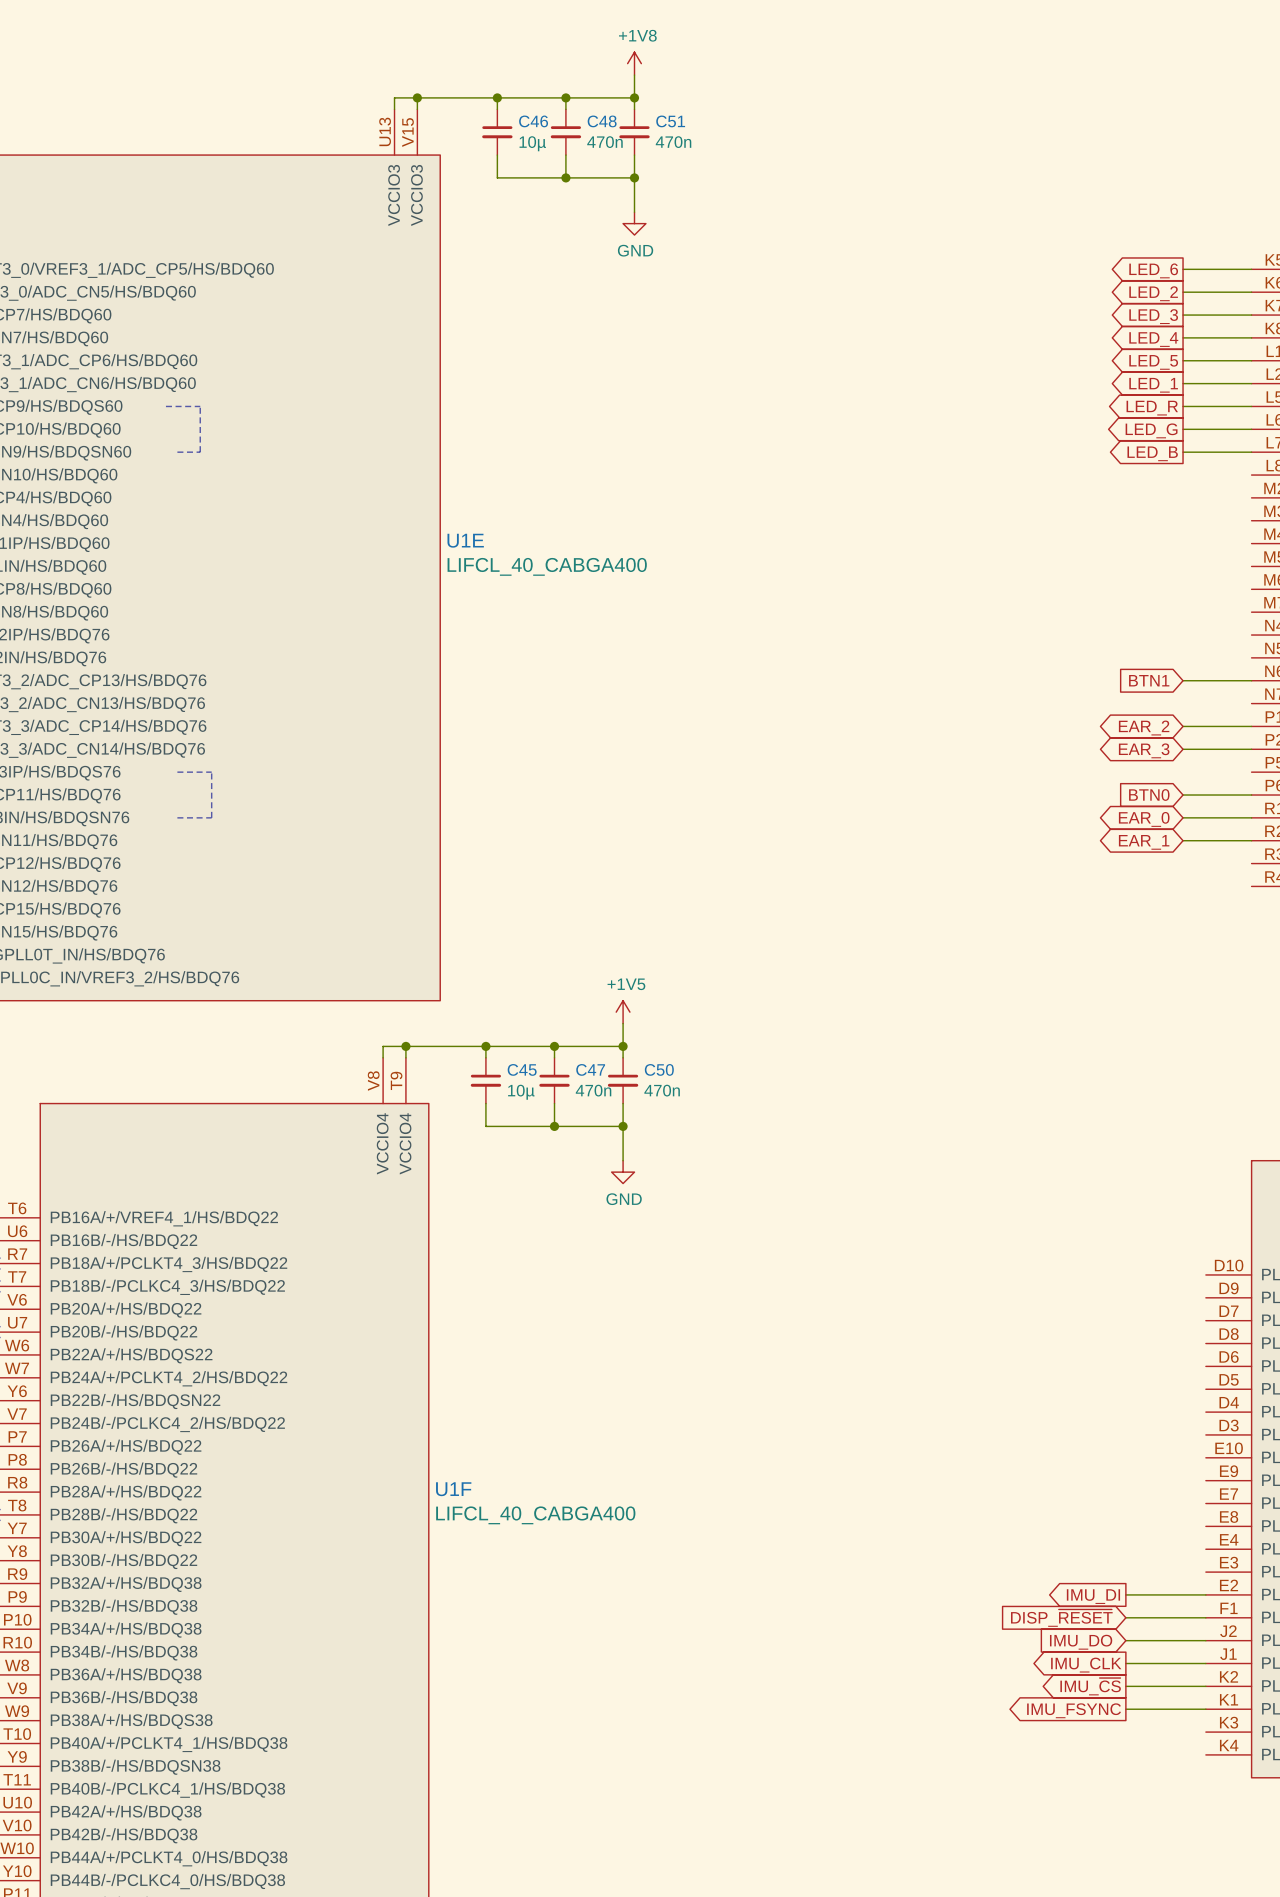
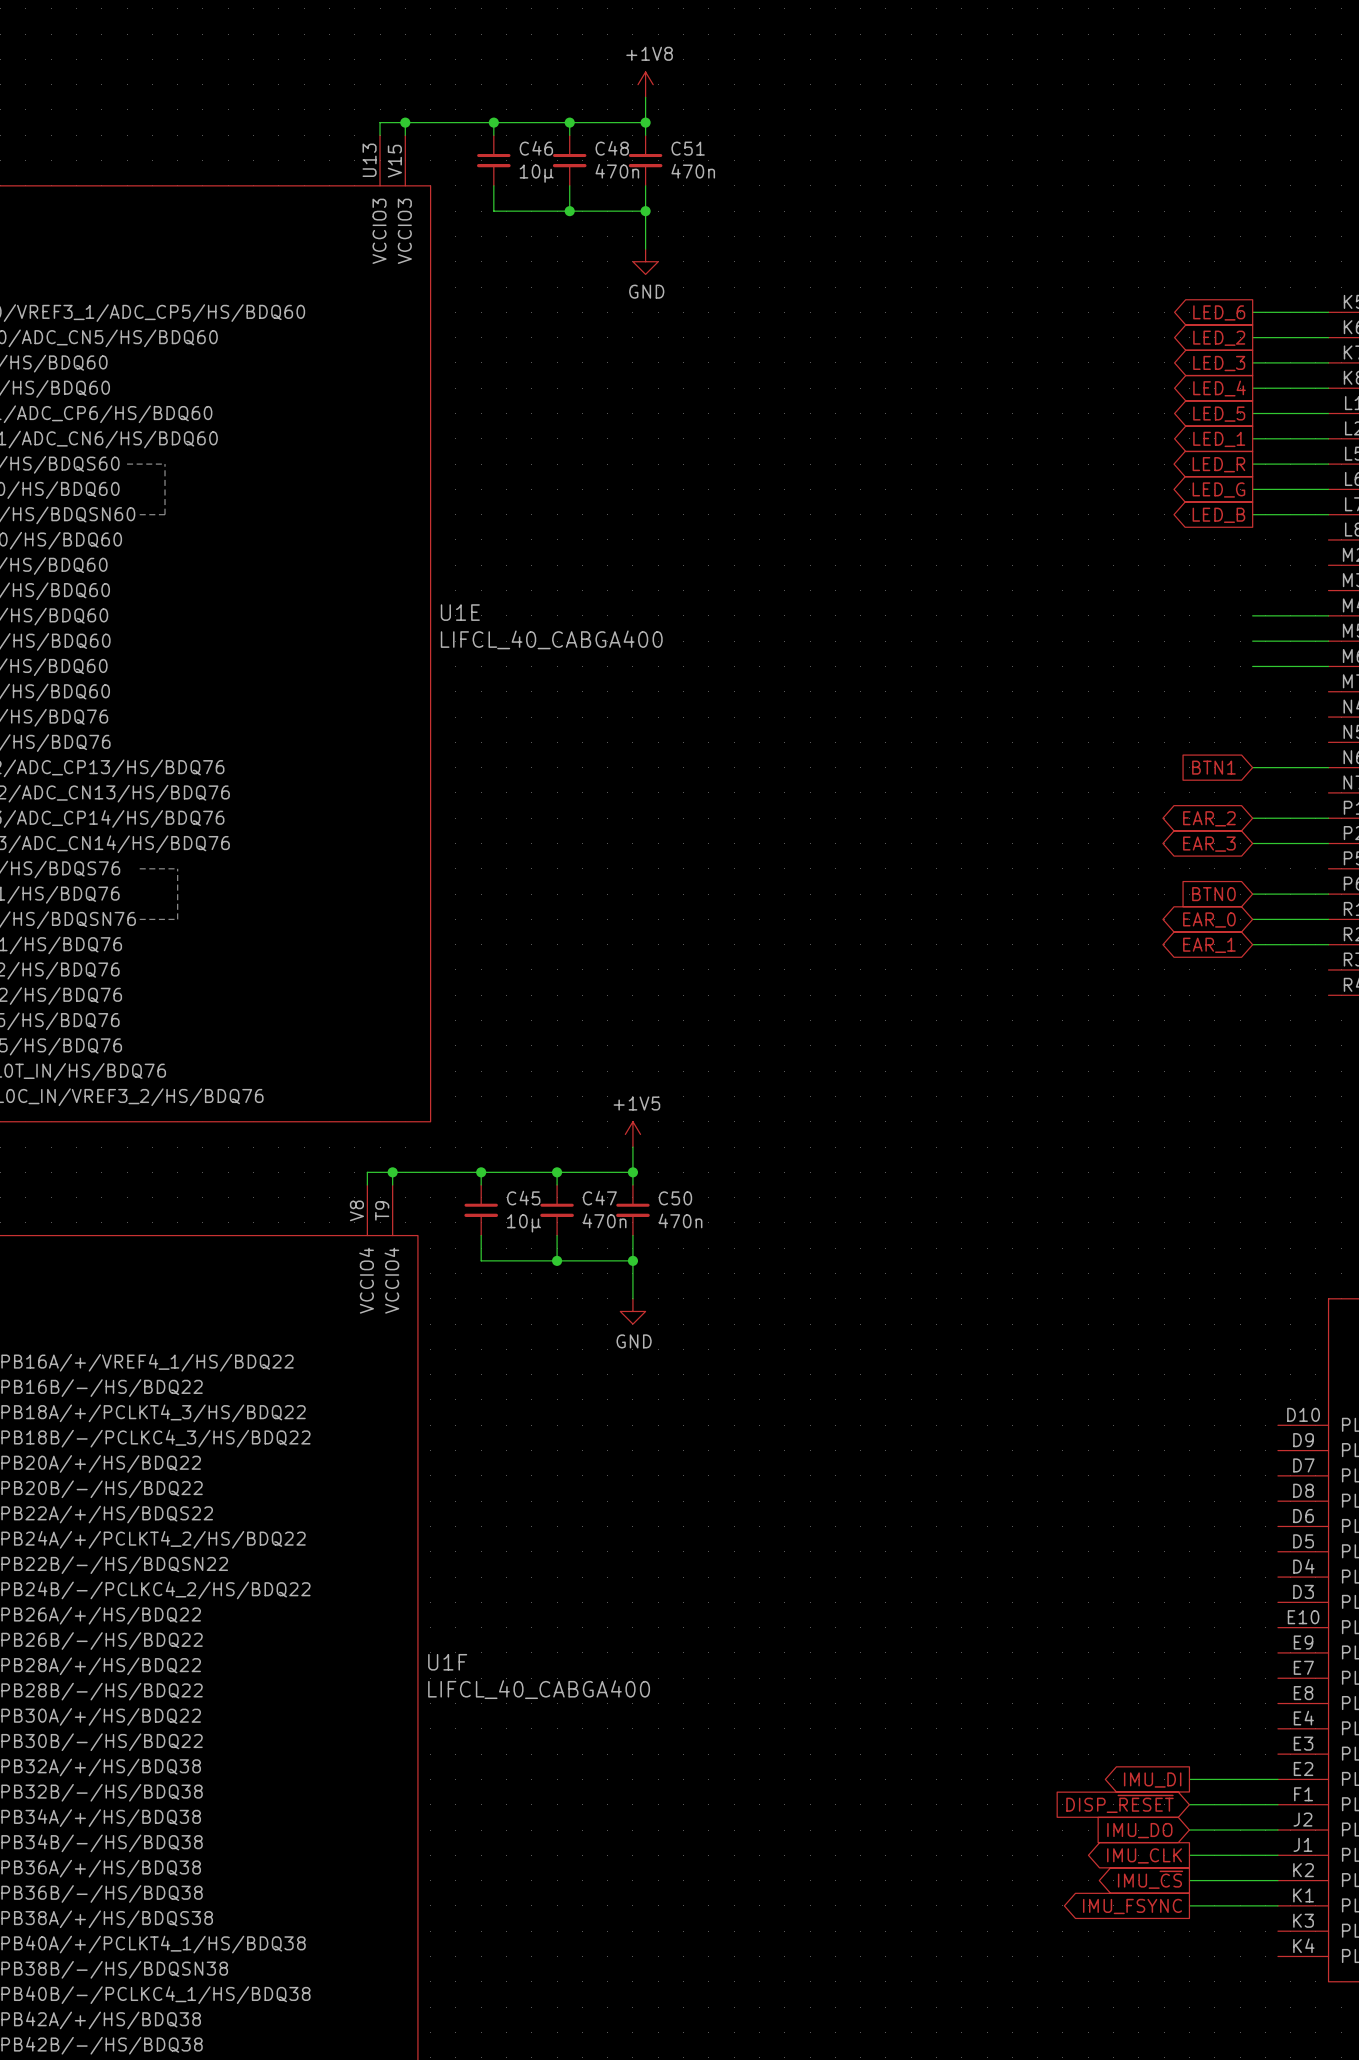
wire: none -> (1252, 615) (1328, 615)
wire: none -> (1252, 641) (1328, 641)
wire: none -> (1252, 666) (1328, 666)

